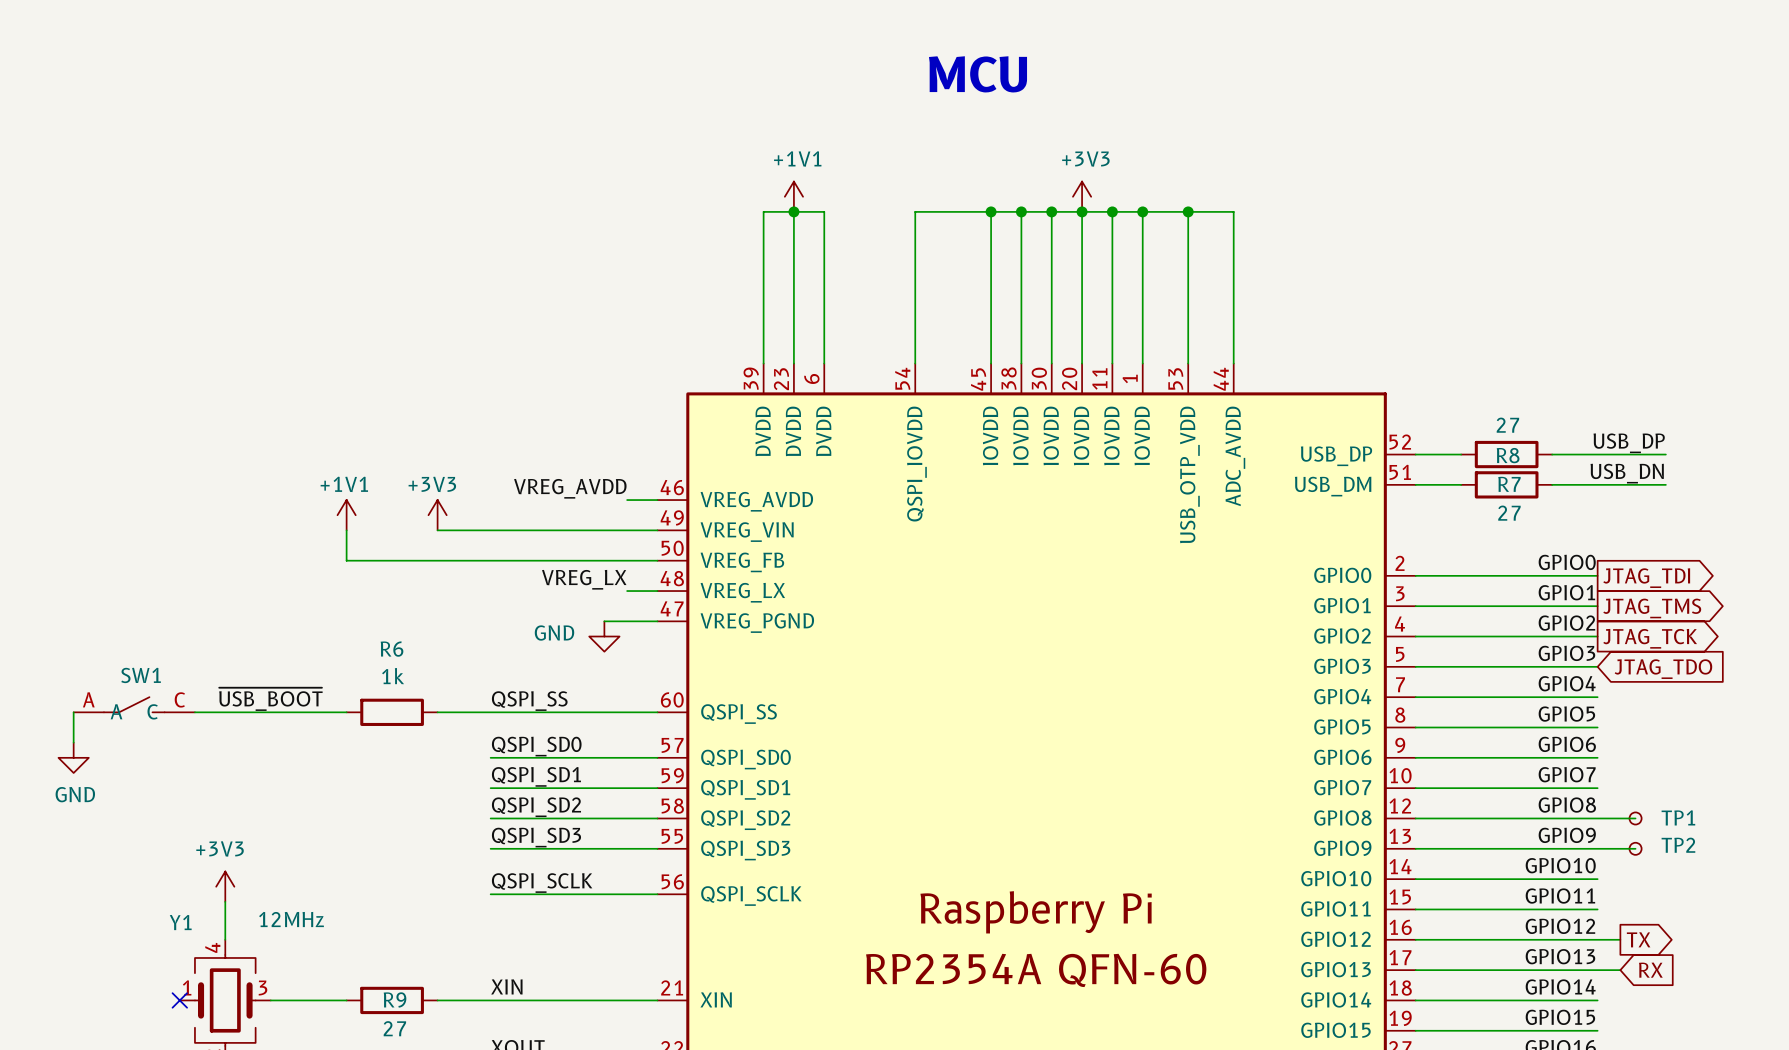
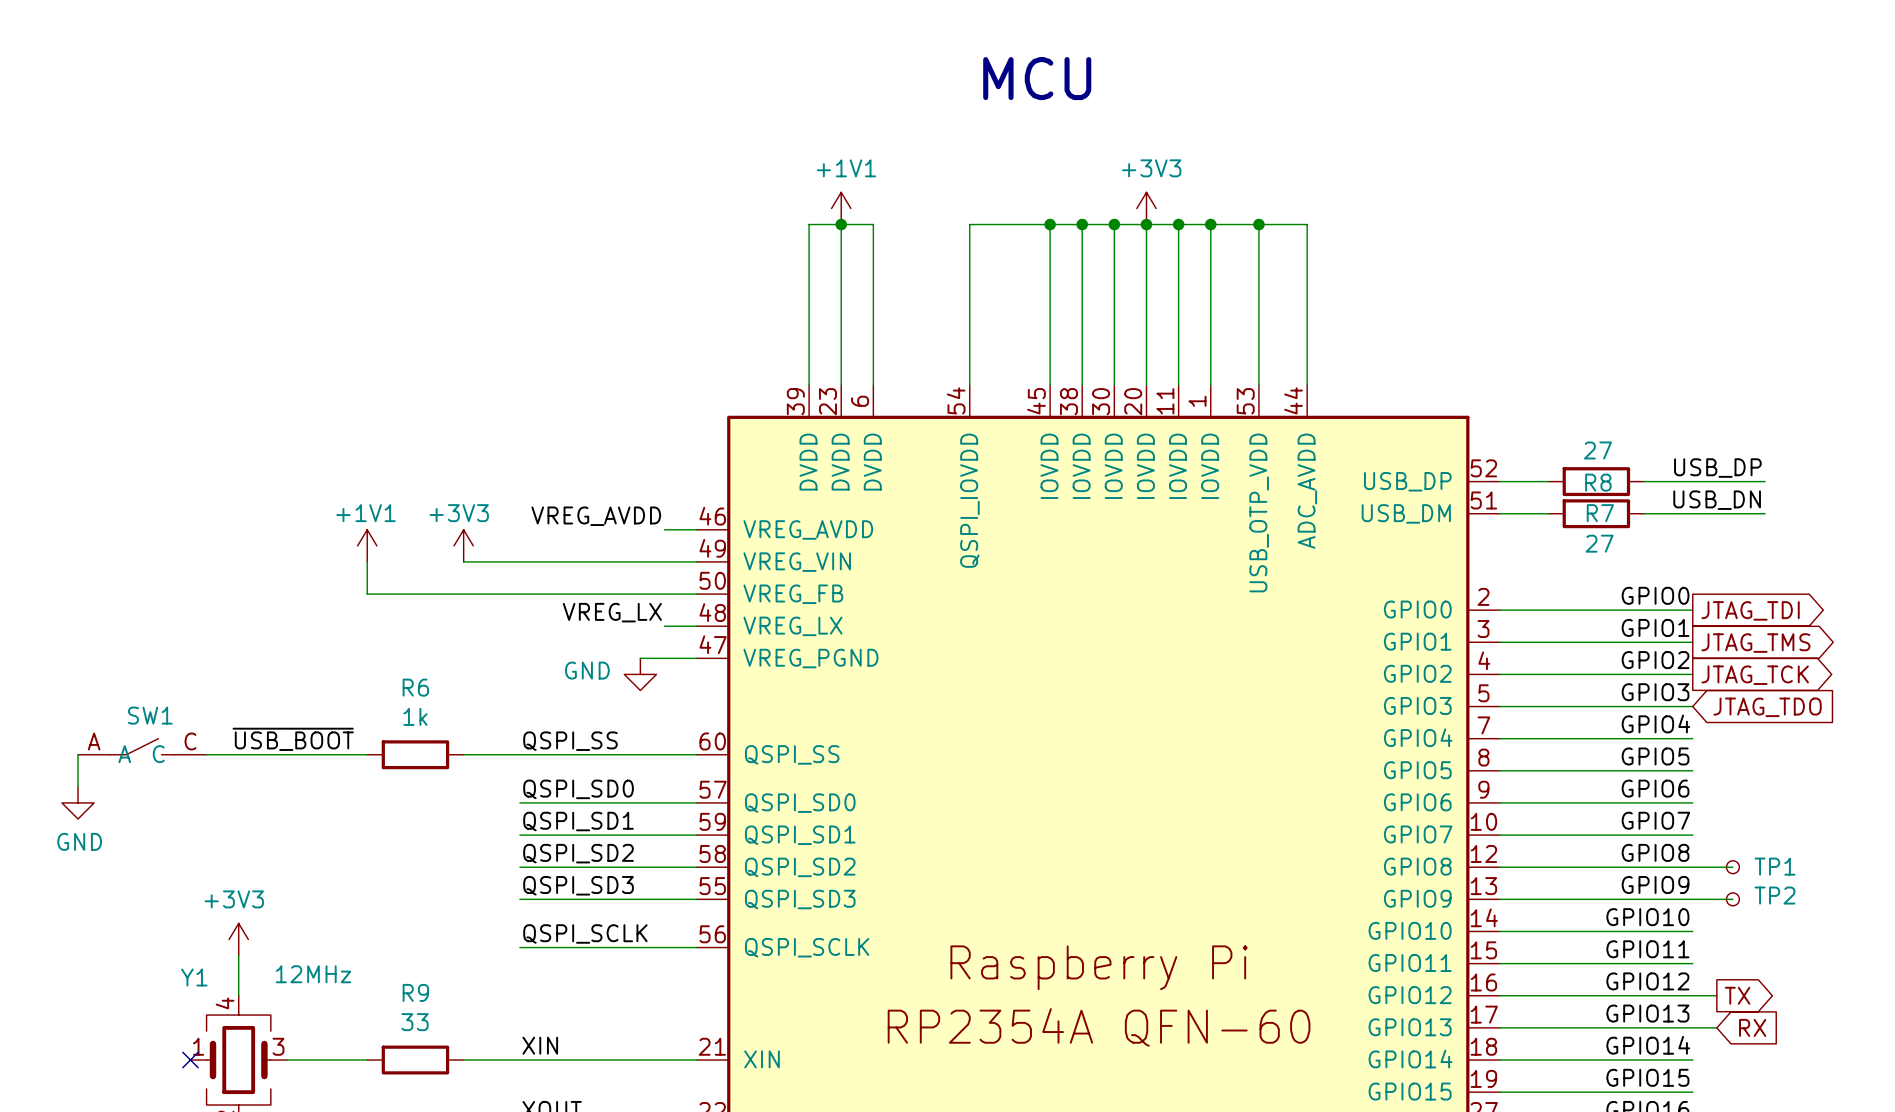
R9 name position: R9 (395, 999) -> R9 (415, 992)
R9 value: 27 (394, 1028) -> 33 (415, 1022)

